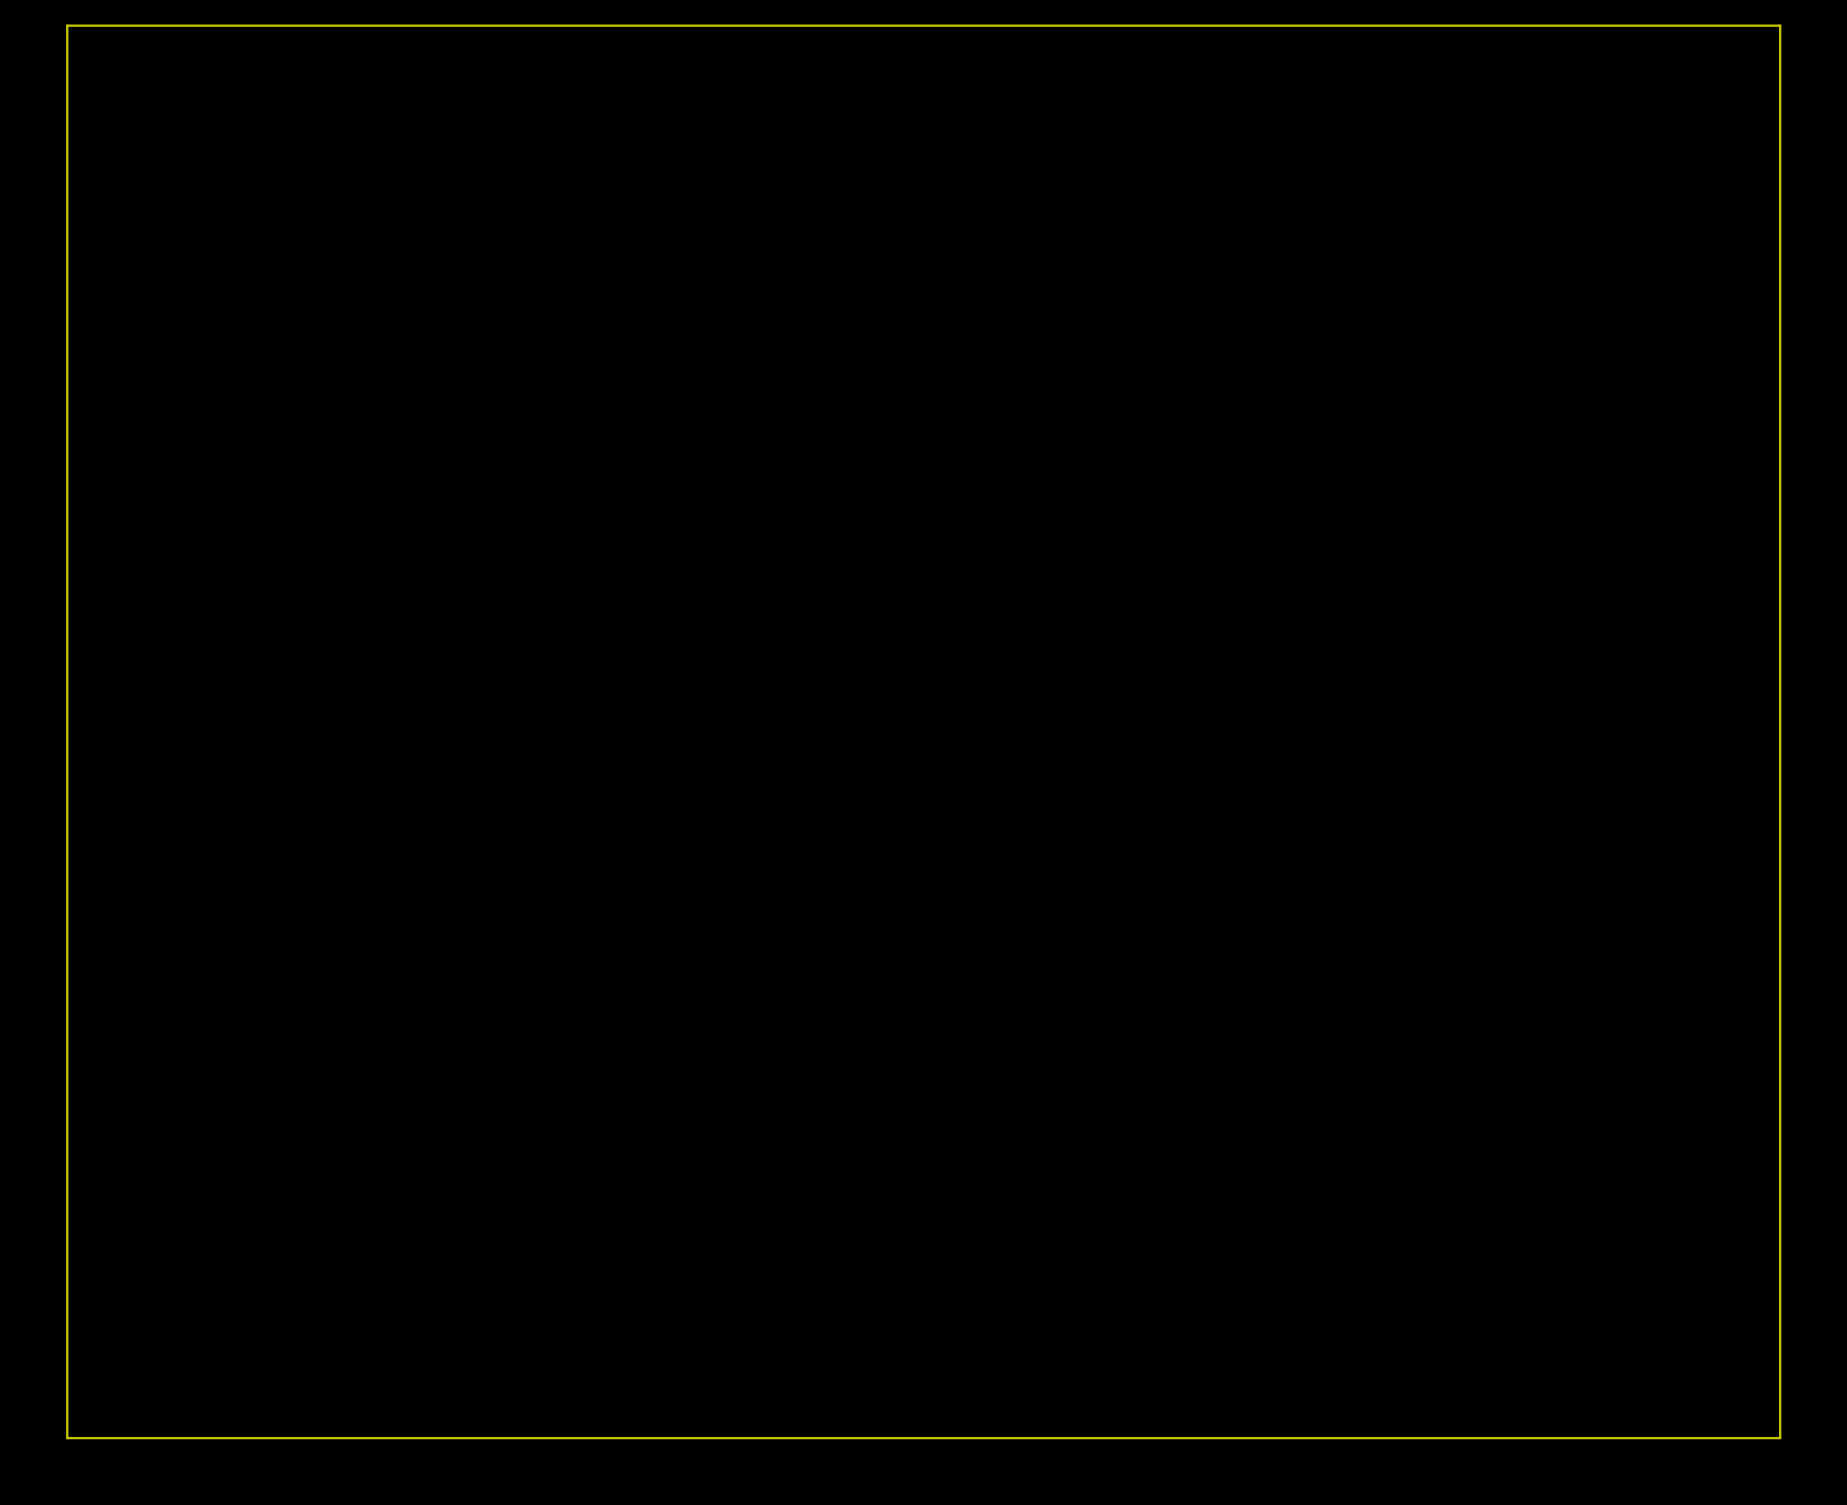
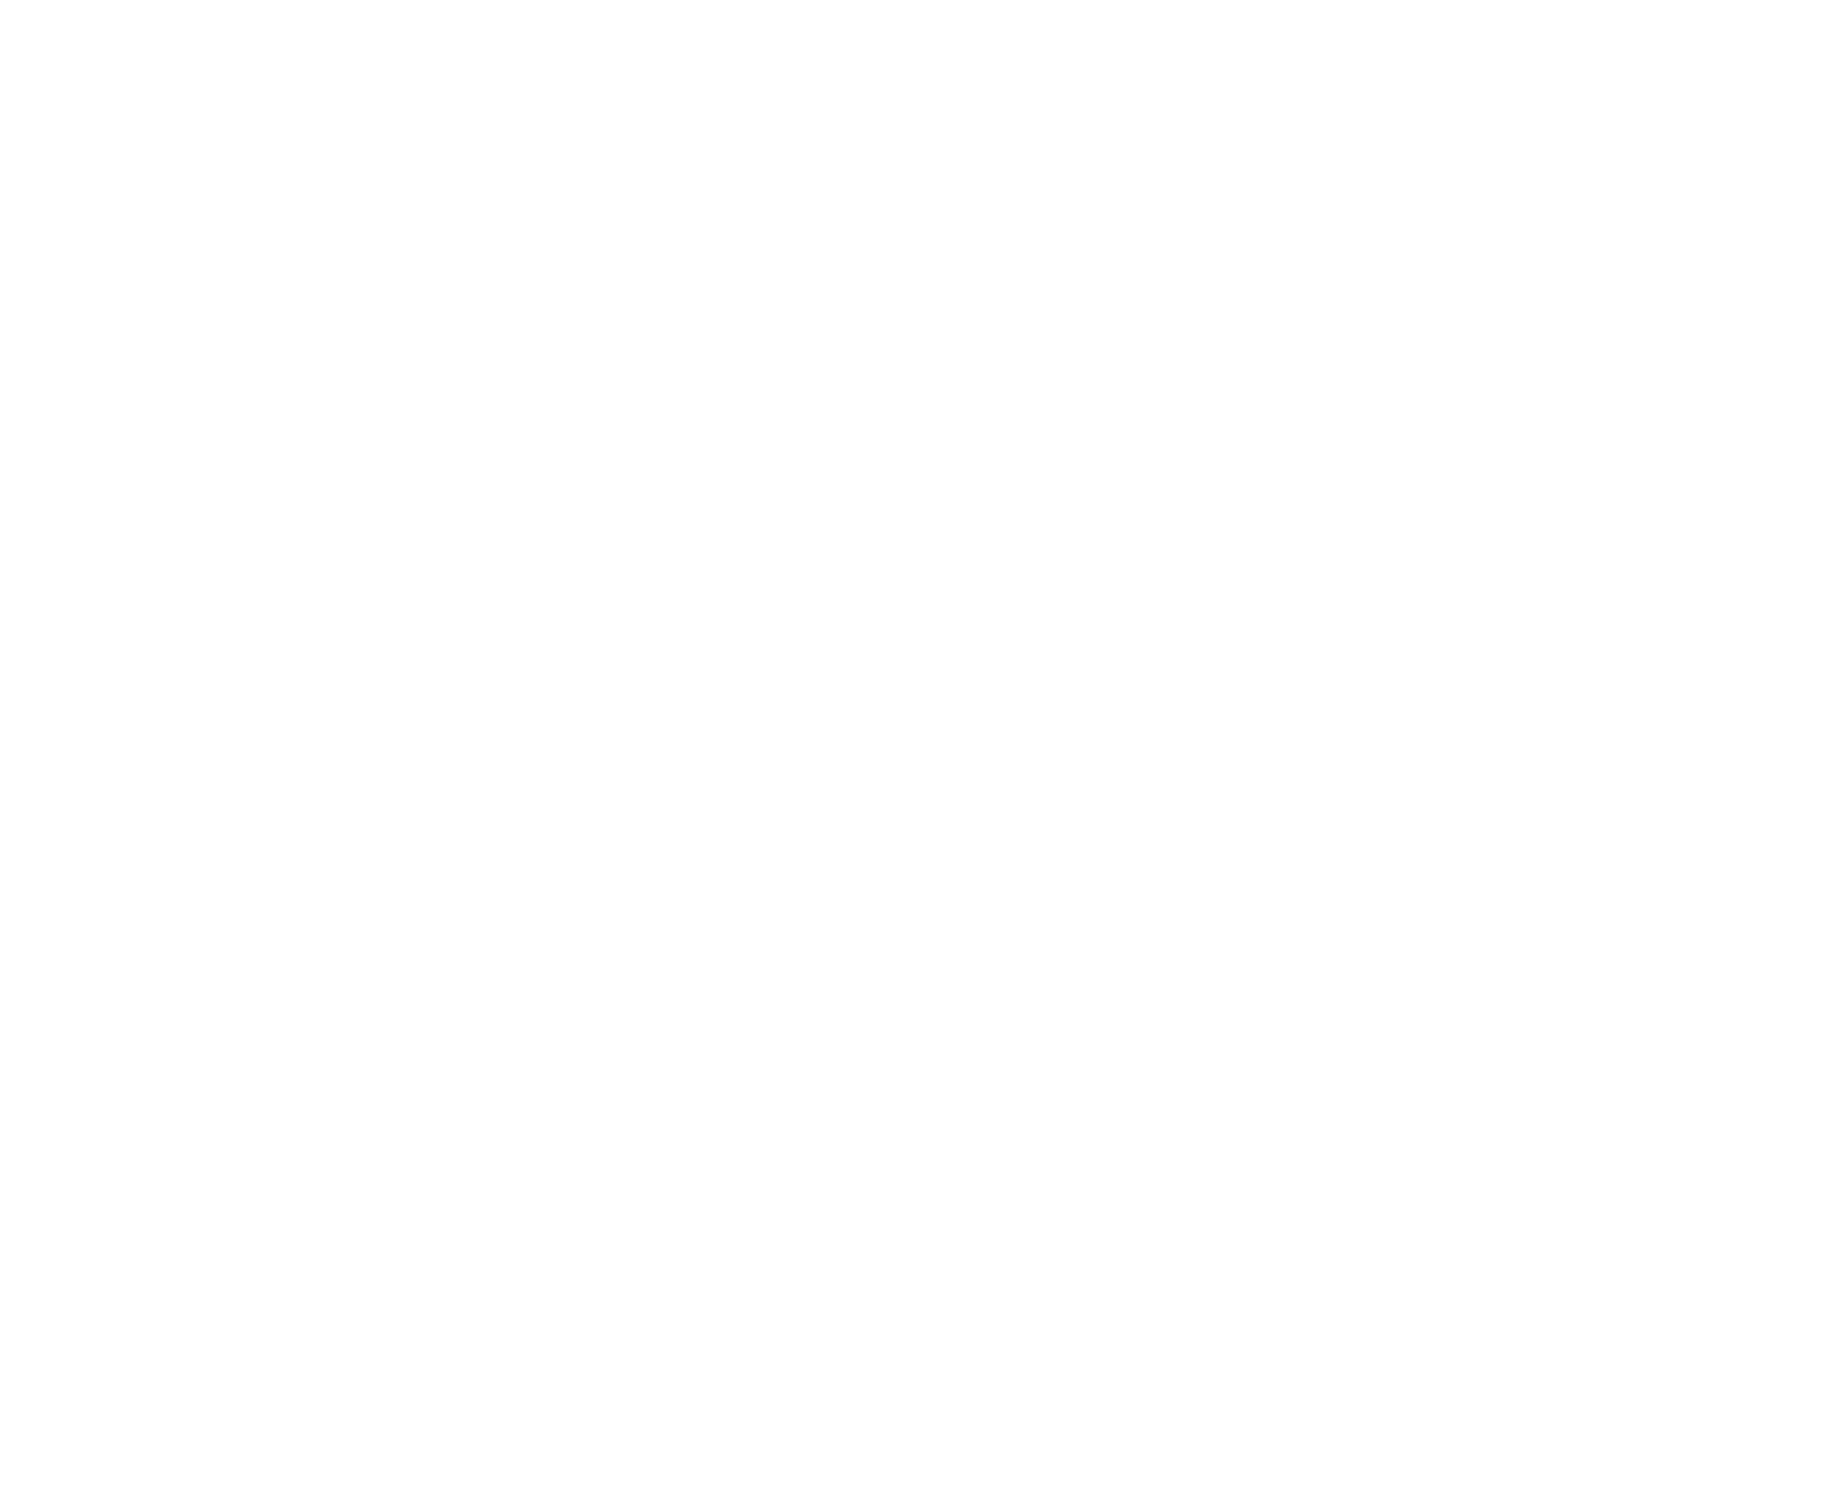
board edge: (1780, 25) (1780, 1438) (67, 1438) (67, 25) (1780, 25) -> none

